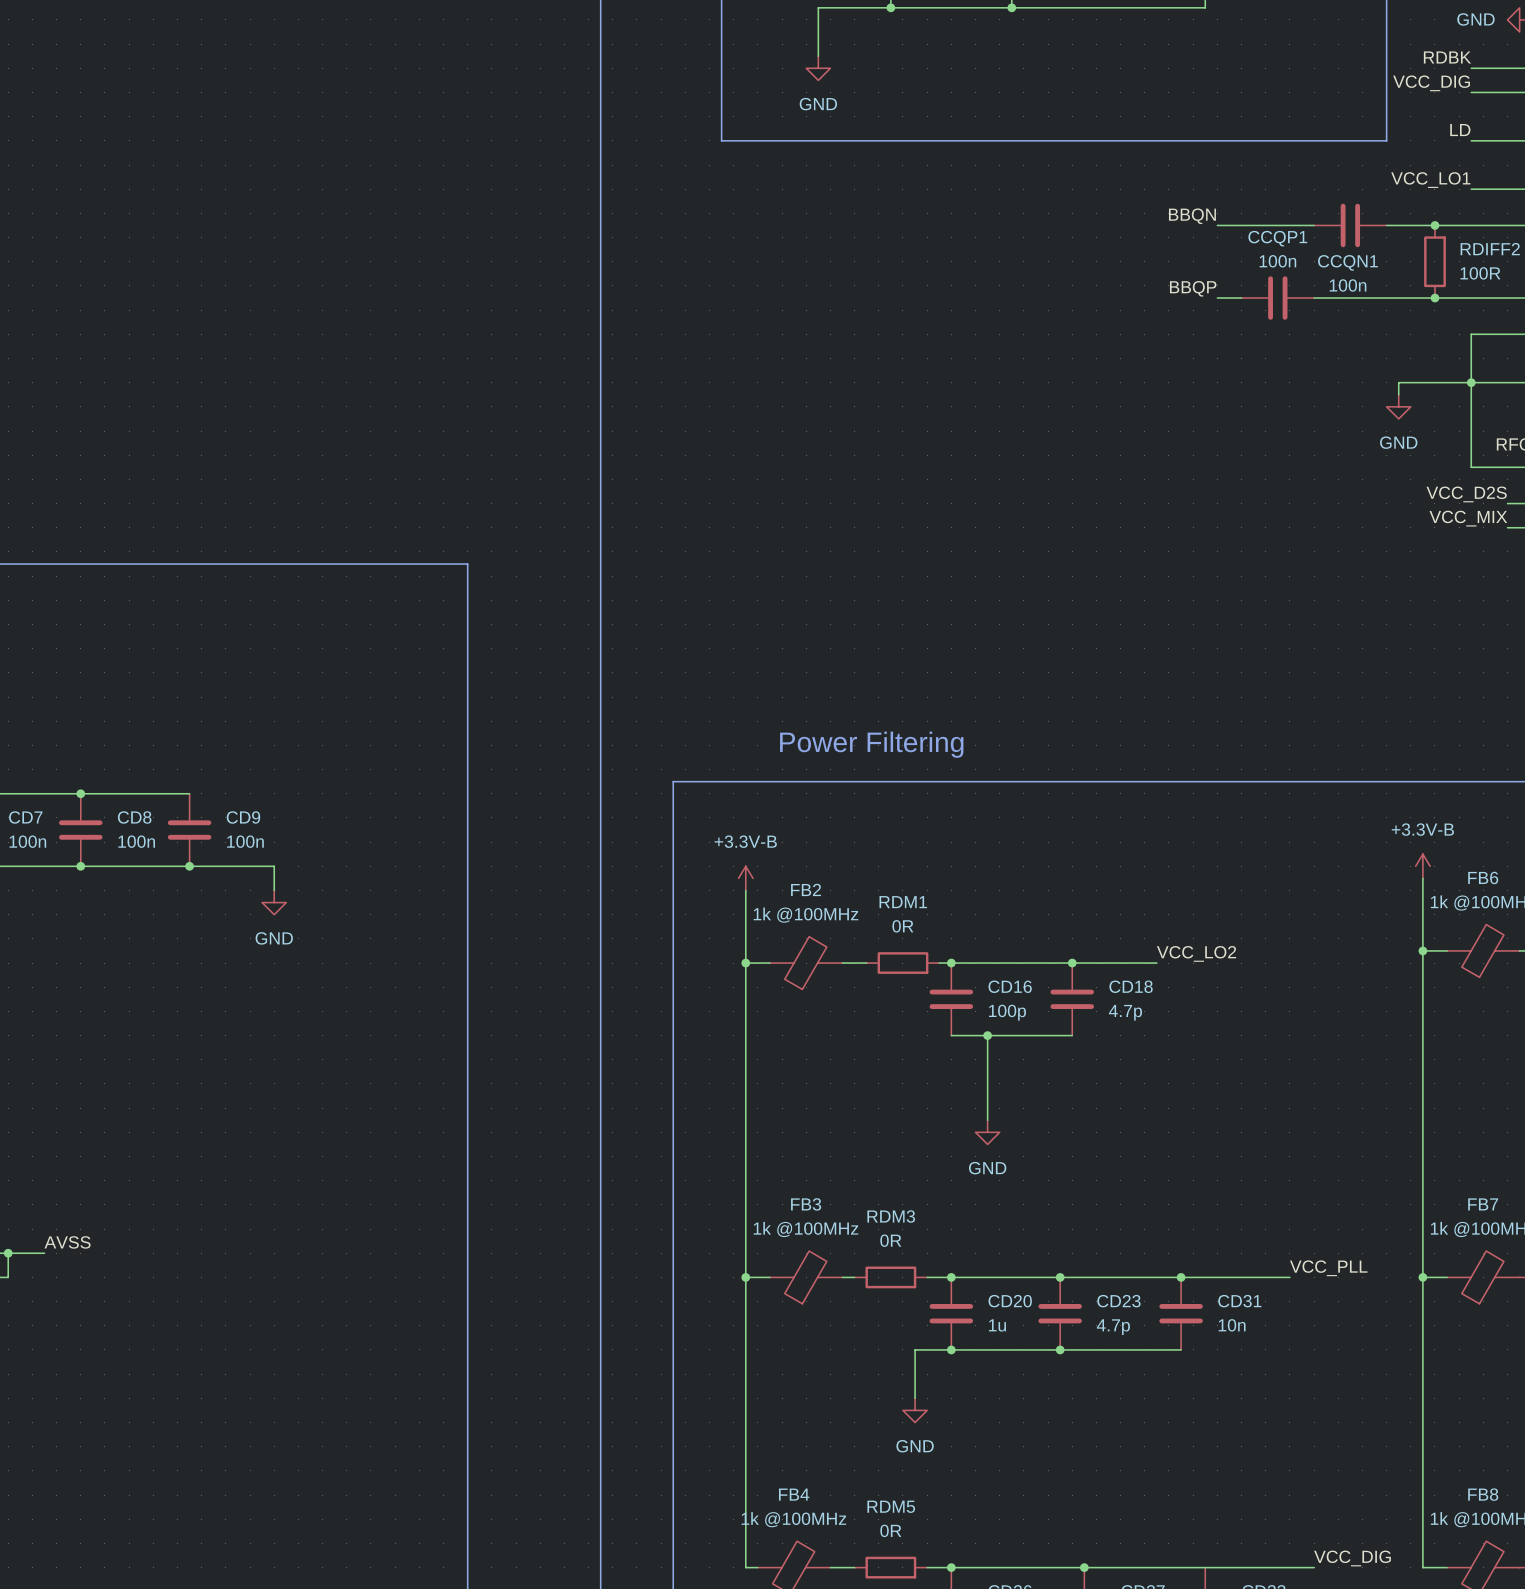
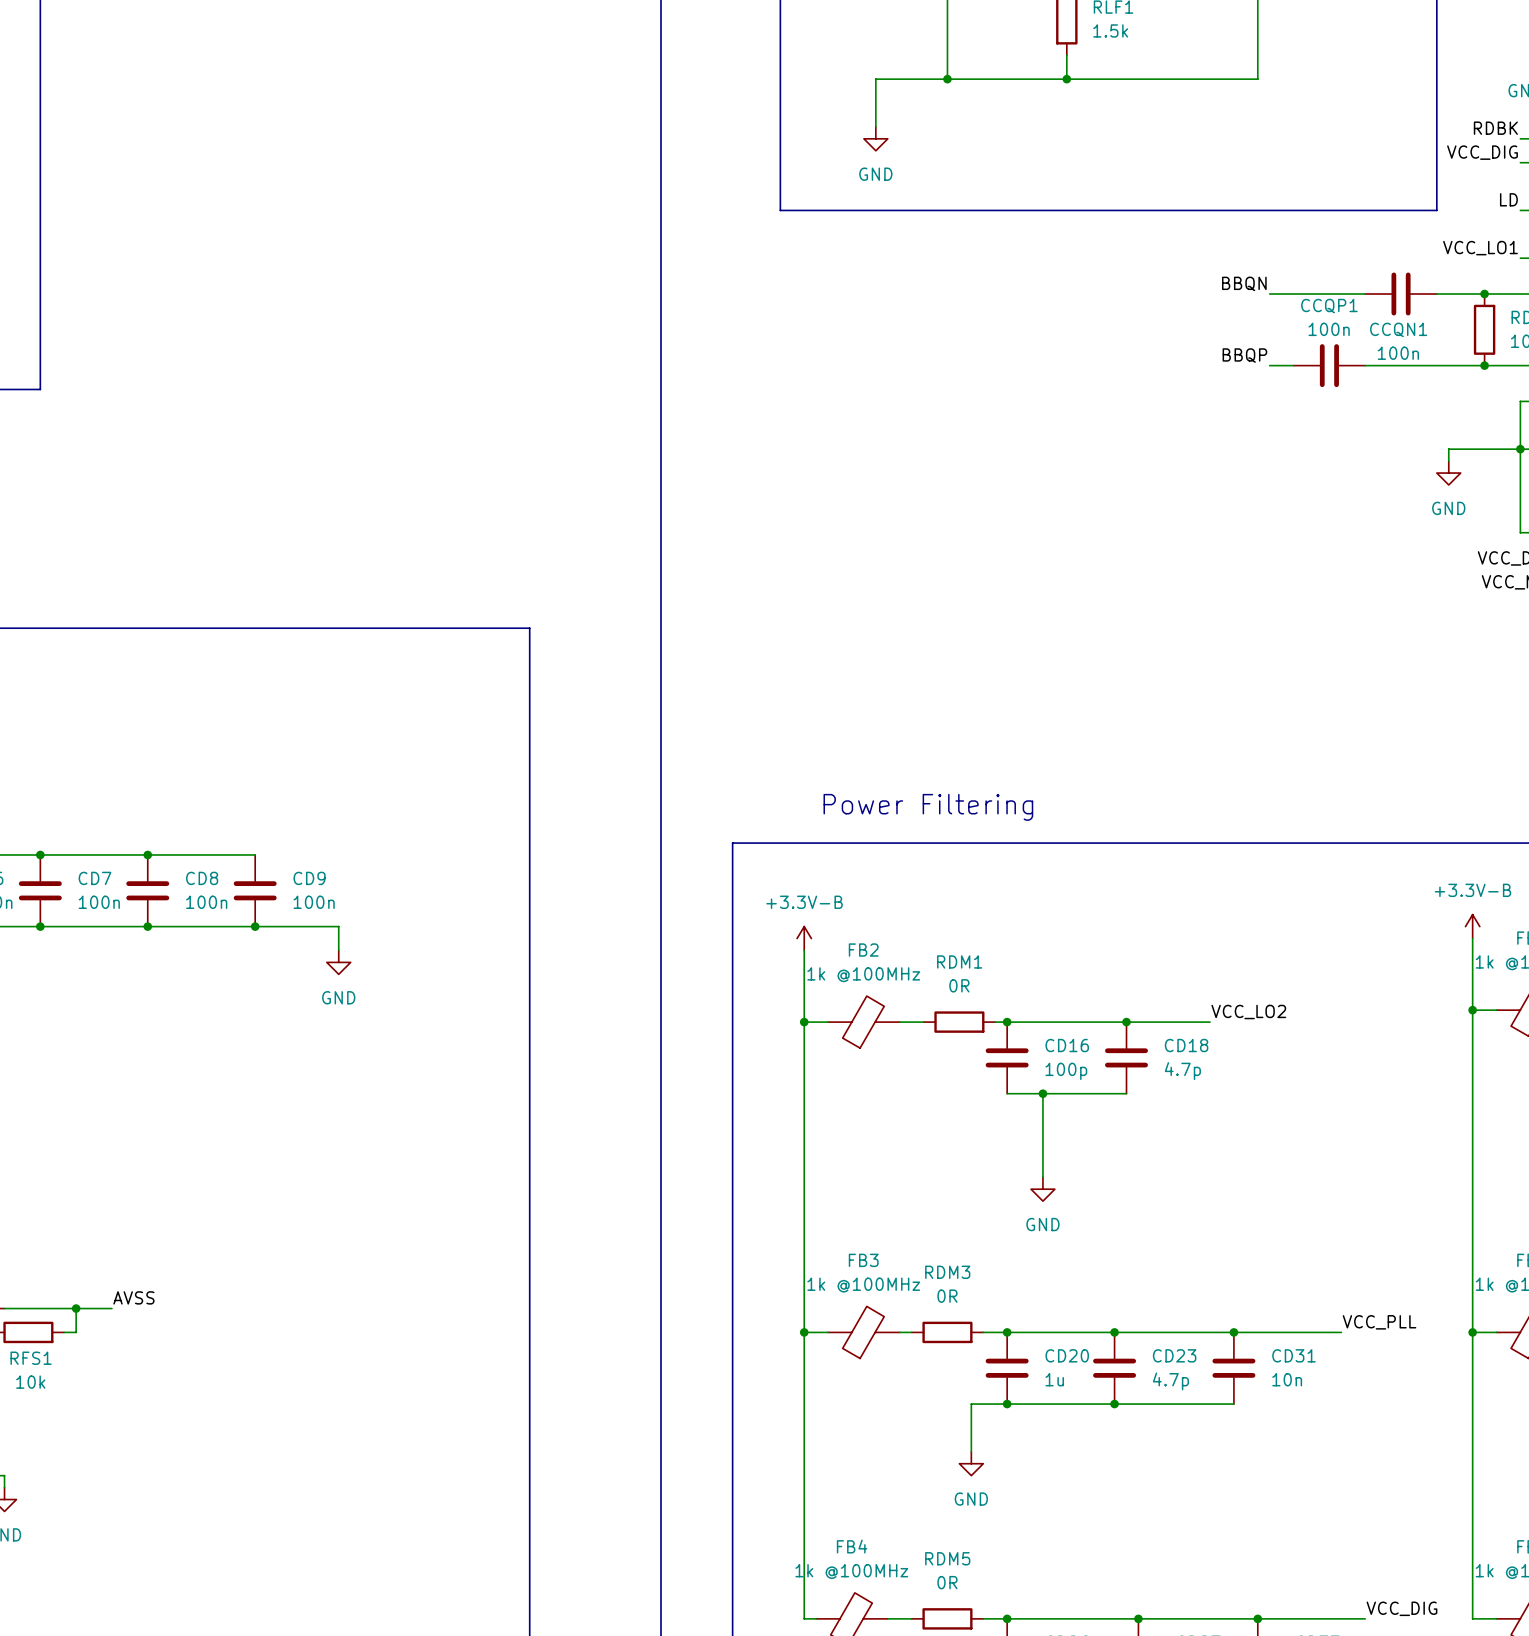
junction: none -> (1257, 1618)

